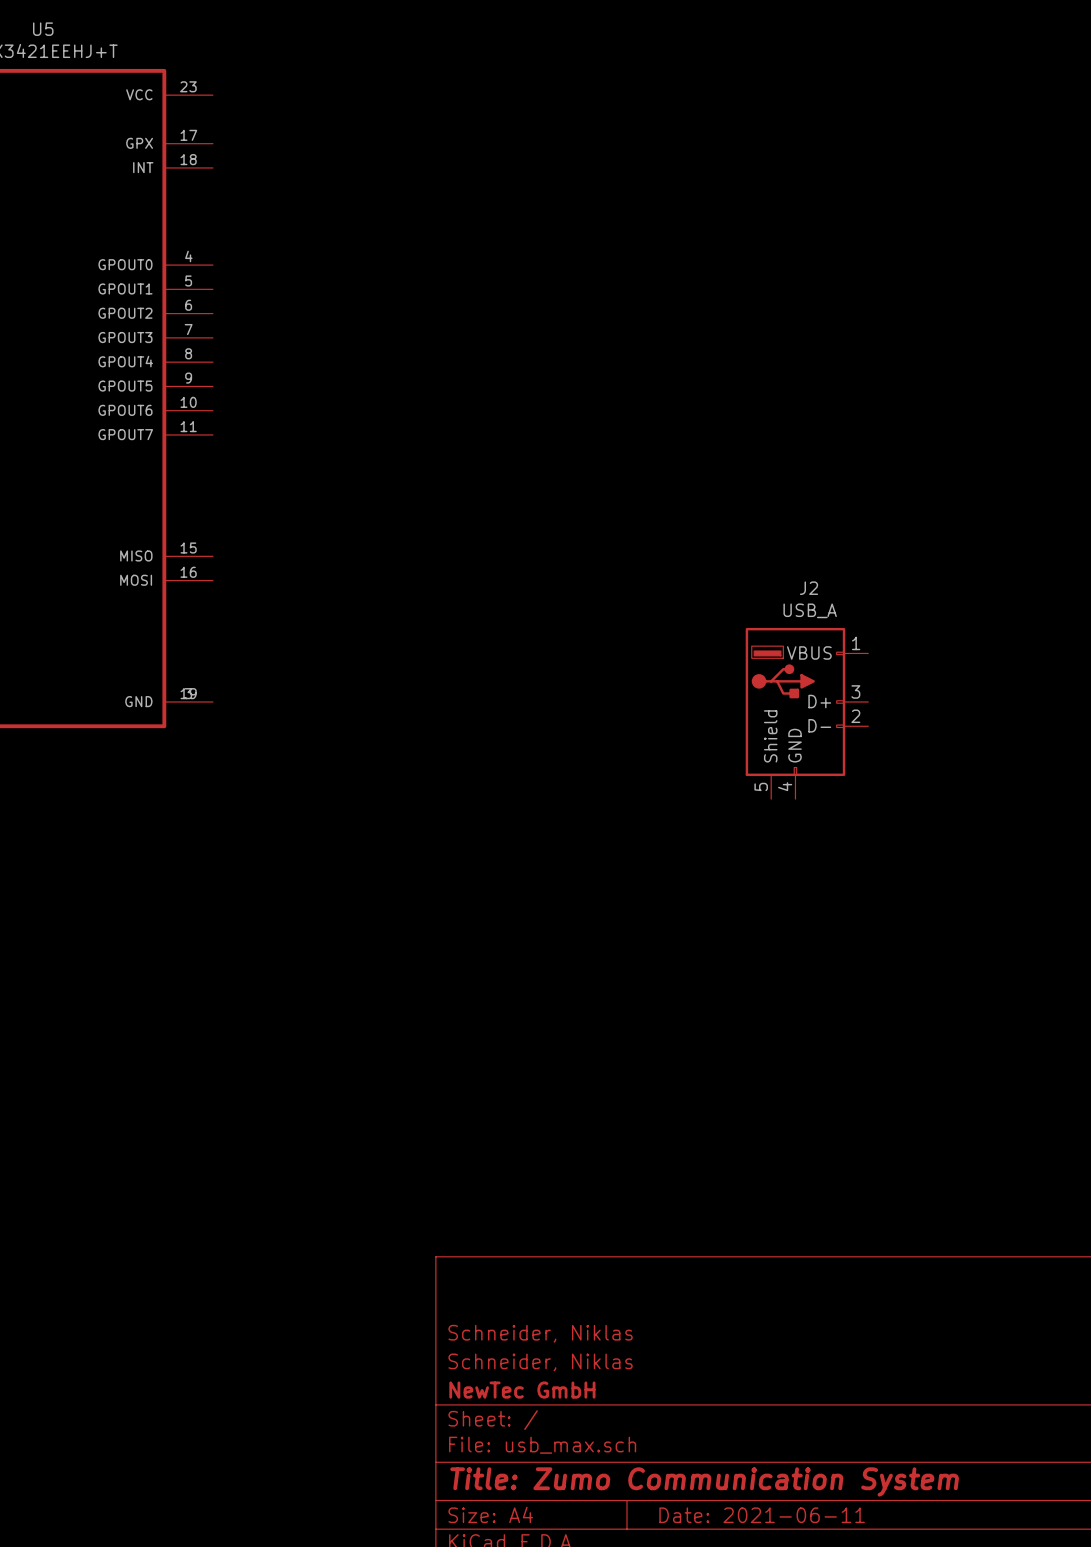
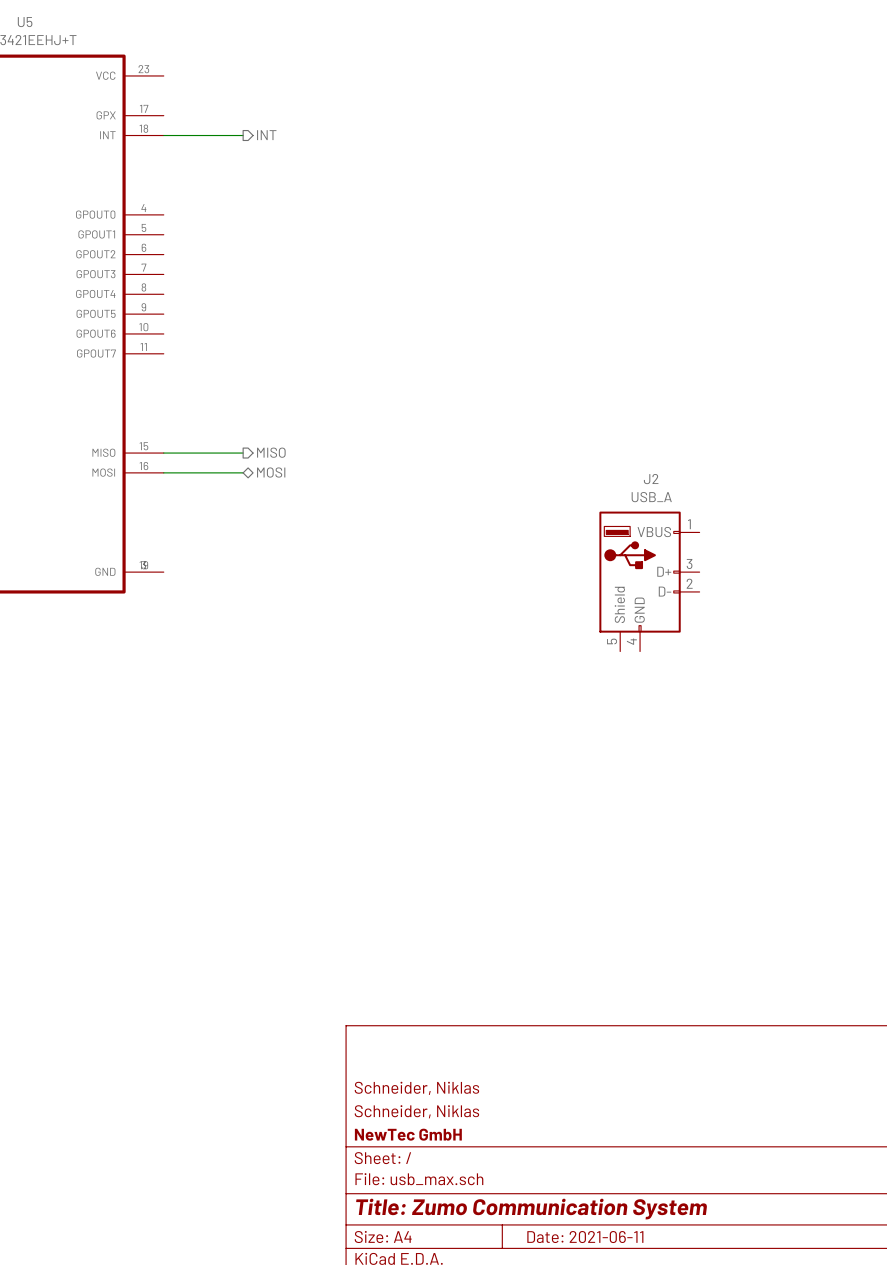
wire: none -> (163, 135) (243, 135)
hierarchical label: none -> INT (266, 135)
hierarchical label: none -> MISO (271, 452)
wire: none -> (163, 453) (243, 453)
wire: none -> (163, 472) (243, 472)
hierarchical label: none -> MOSI (271, 472)

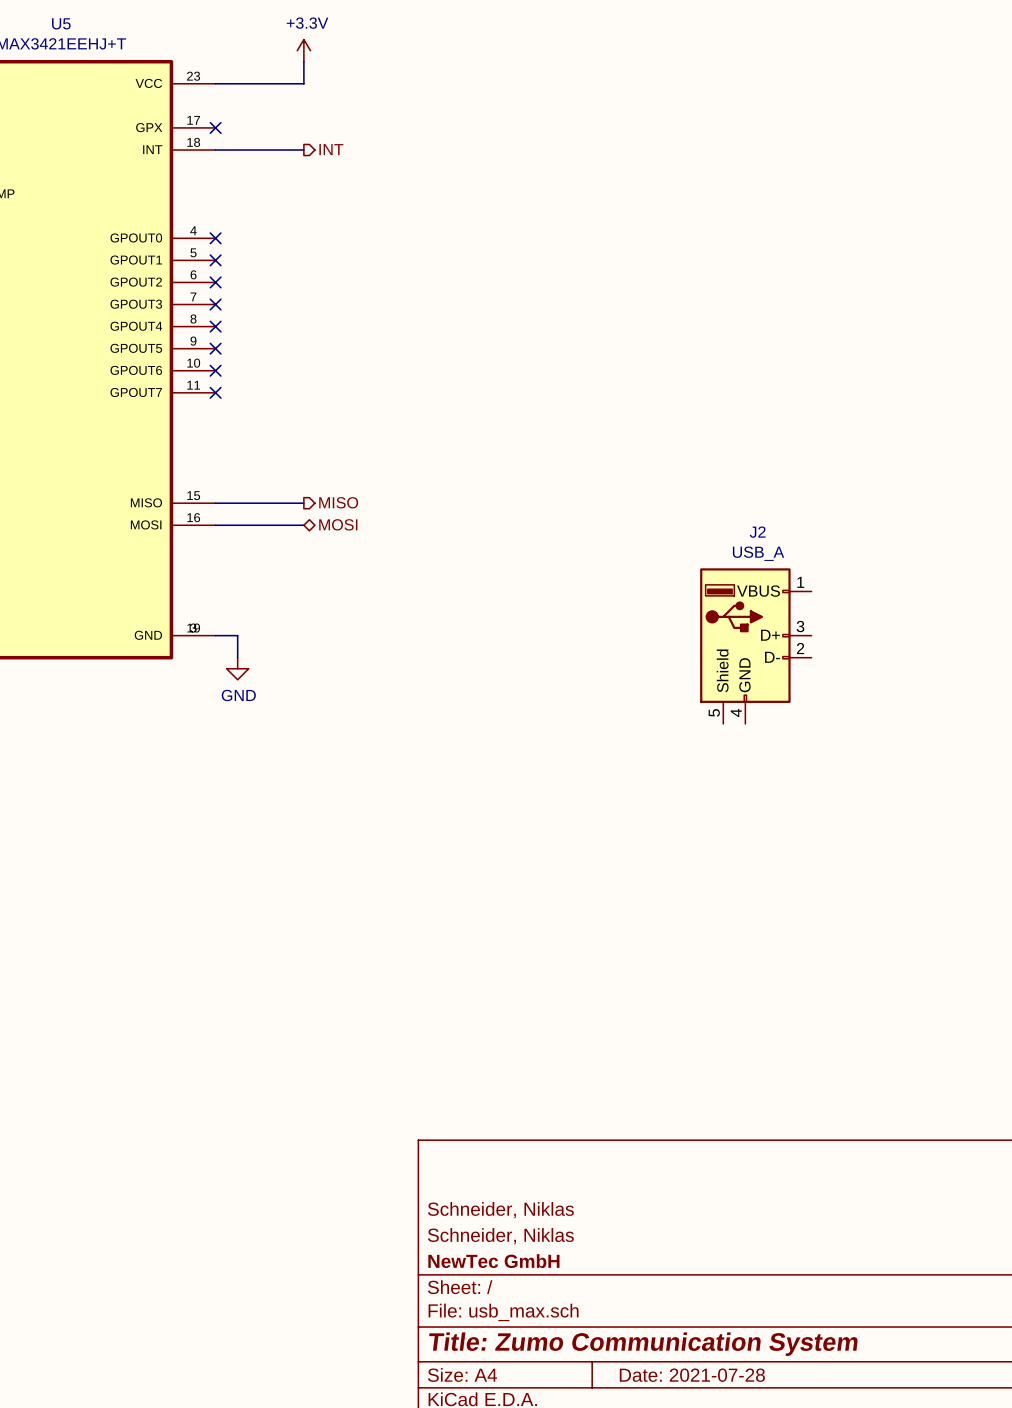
power symbol: none -> +3.3V (303, 50)
wire: none -> (303, 61) (303, 83) (215, 83)
no-connect mark: none -> (215, 127)
no-connect mark: none -> (215, 238)
no-connect mark: none -> (215, 260)
no-connect mark: none -> (215, 282)
no-connect mark: none -> (215, 304)
no-connect mark: none -> (215, 326)
no-connect mark: none -> (215, 348)
no-connect mark: none -> (215, 370)
no-connect mark: none -> (215, 392)
wire: none -> (215, 635) (237, 635) (237, 657)
power symbol: none -> GND (237, 668)
title block: Date: 2021-06-11 (585, 1237) -> Date: 2021-07-28 (692, 1375)

